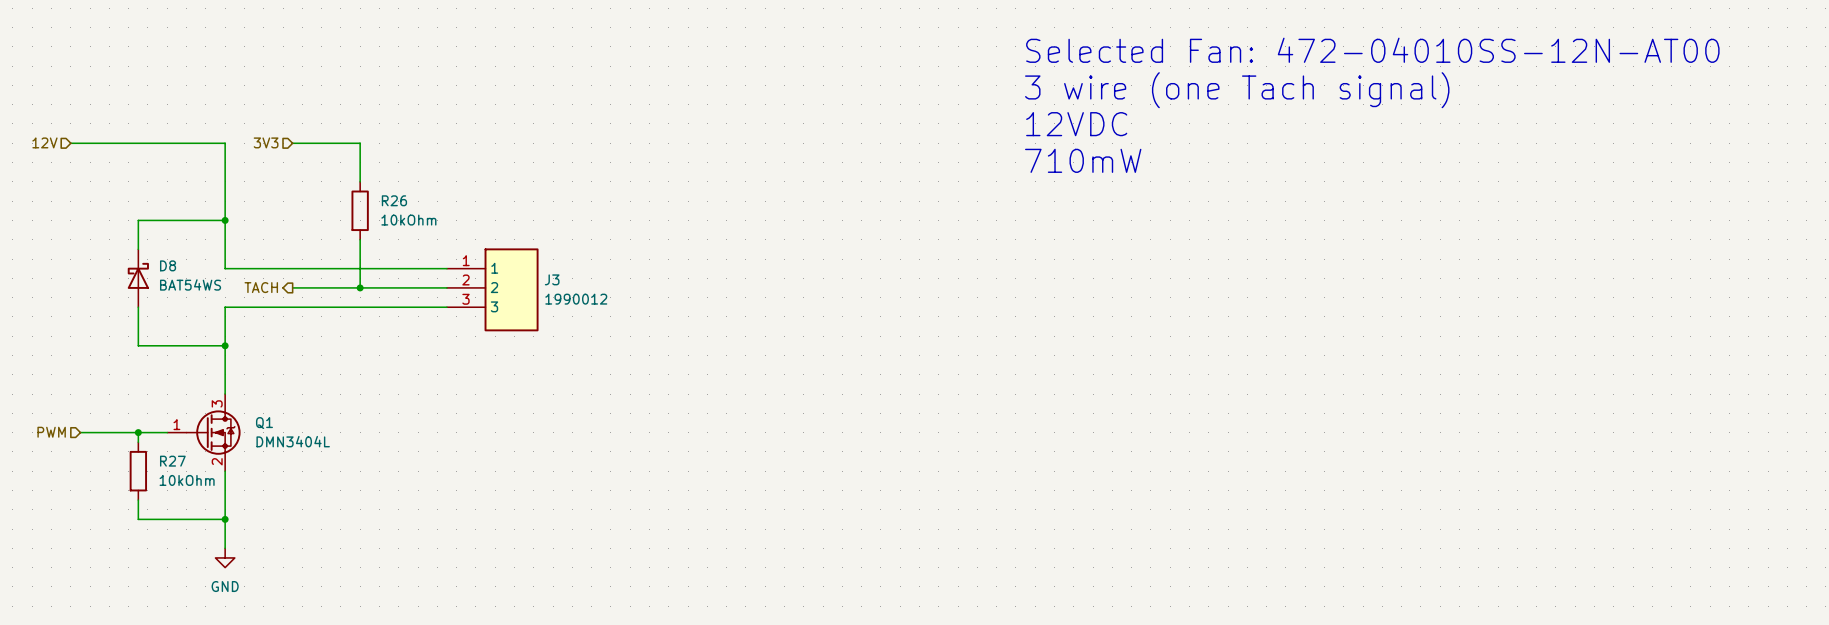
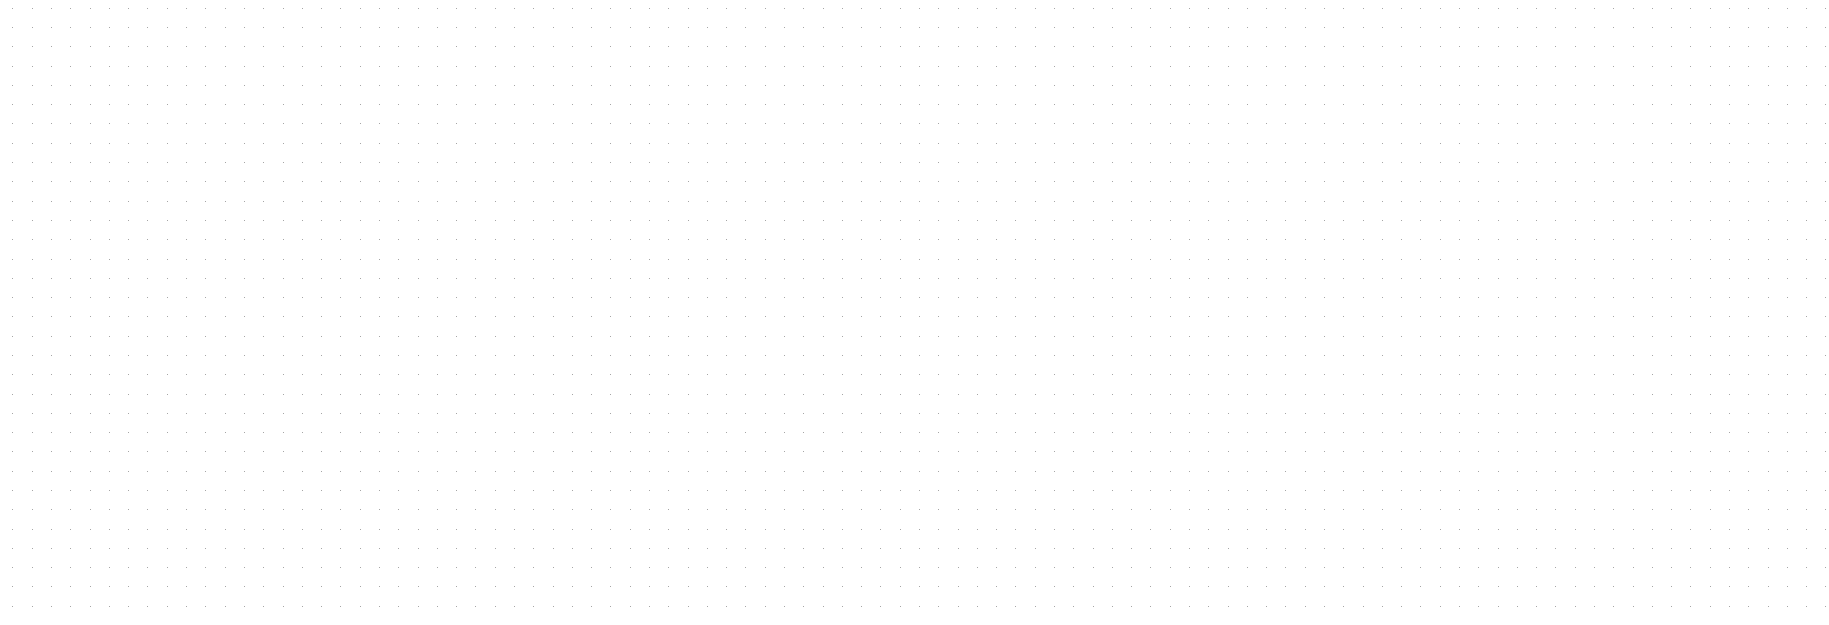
text: Selected Fan: 472-04010SS-12N-AT00 (1372, 50) -> none
text: 3 wire (one Tach signal) (1237, 90) -> none
text: 12VDC (1076, 124) -> none
hierarchical label: 12V (44, 142) -> none
hierarchical label: 3V3 (266, 142) -> none
wire: (70, 143) (225, 143) (225, 268) (446, 268) -> none
wire: (292, 143) (360, 143) (360, 181) -> none
text: 710mW (1083, 160) -> none
R26: 10kOhm (360, 210) -> none
wire: (225, 220) (138, 220) (138, 249) -> none
junction: (225, 220) -> none
wire: (360, 239) (360, 287) -> none
D8: BAT54WS (138, 278) -> none
hierarchical label: TACH (261, 287) -> none
wire: (292, 287) (446, 287) -> none
junction: (360, 287) -> none
J3: 1990012 (492, 289) -> none
wire: (138, 307) (138, 345) (225, 345) -> none
wire: (446, 307) (225, 307) (225, 394) -> none
junction: (225, 345) -> none
hierarchical label: PWM (51, 432) -> none
wire: (80, 432) (167, 432) -> none
wire: (138, 432) (138, 442) -> none
junction: (138, 432) -> none
Q1: DMN3404L (203, 432) -> none
R27: 10kOhm (138, 471) -> none
wire: (225, 471) (225, 548) -> none
wire: (138, 500) (138, 519) (225, 519) -> none
junction: (225, 519) -> none
power symbol: GND (225, 557) -> none

